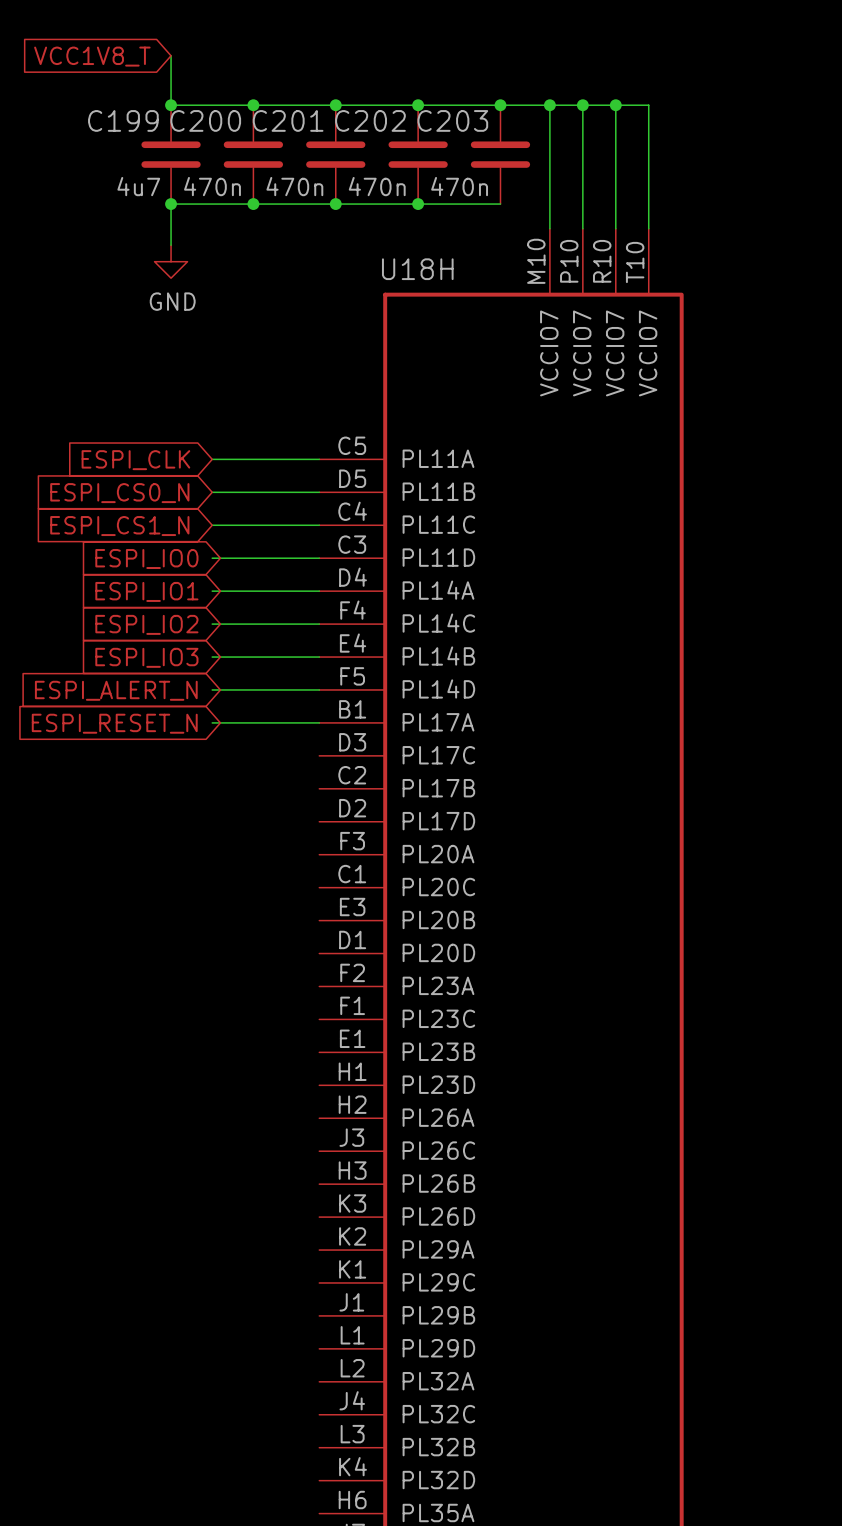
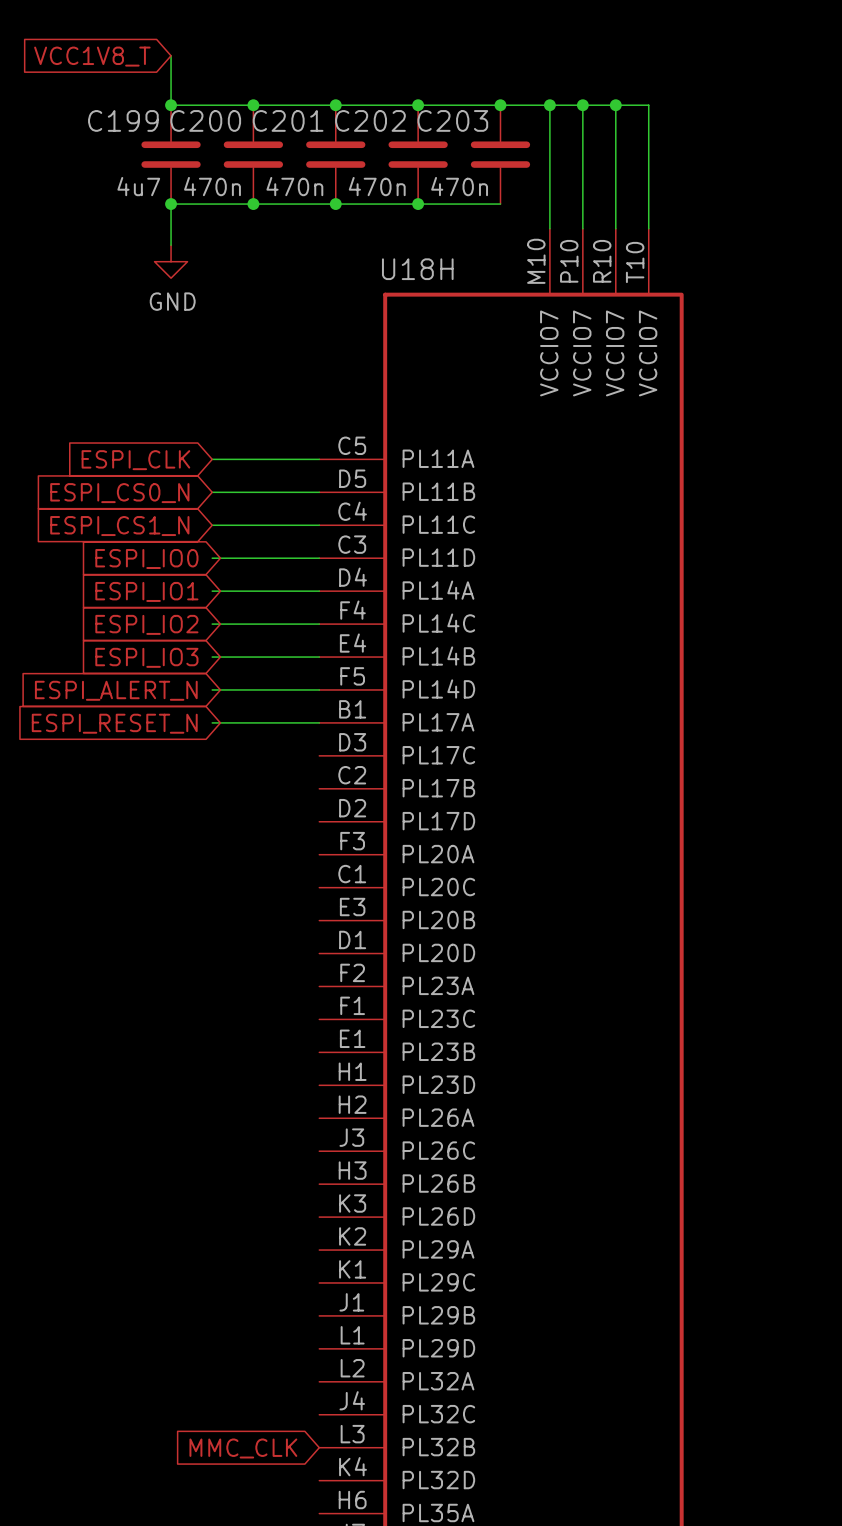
global label: none -> MMC_CLK (243, 1448)

